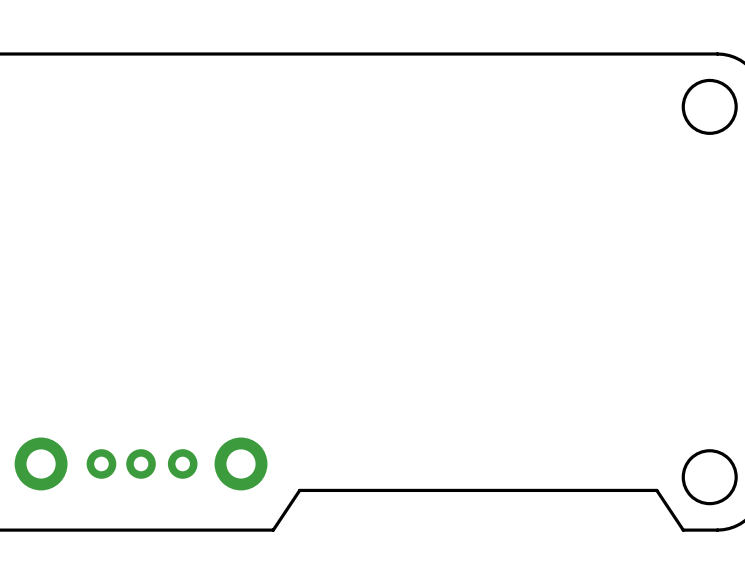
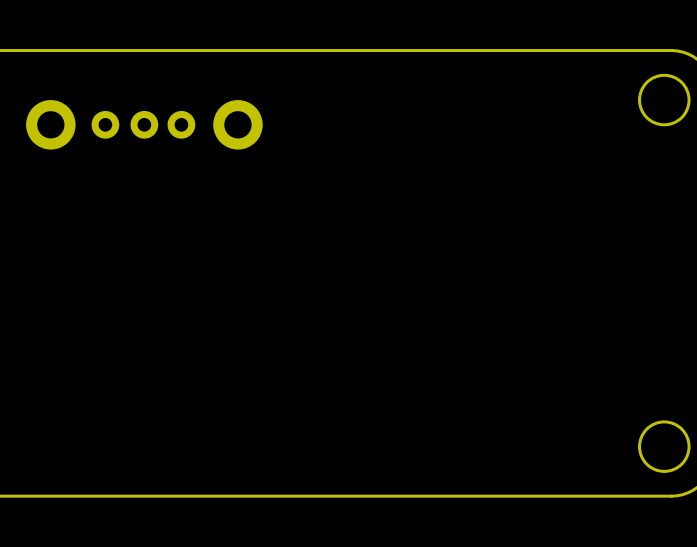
part rotation: 0° (141, 463) -> 180° (144, 124)
part position: (141, 463) -> (144, 124)
board edge: (683, 530) (656, 490) (299, 490) (273, 530) -> (639, 496) (255, 496)

